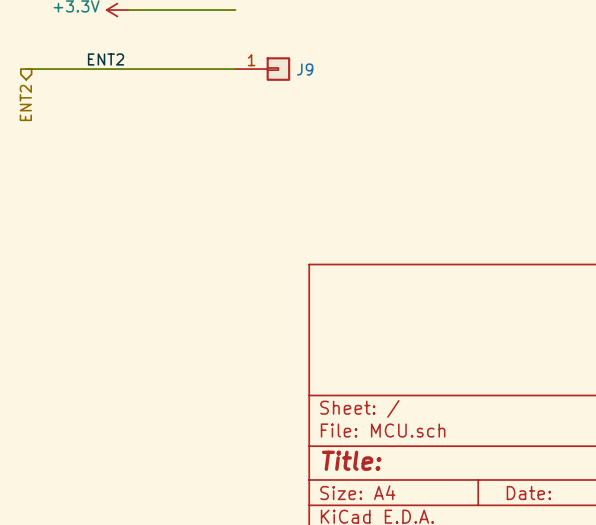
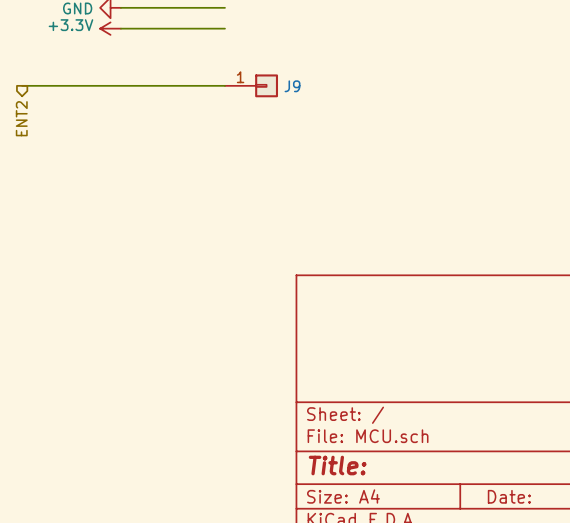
label: ENT2 (106, 59) -> none

